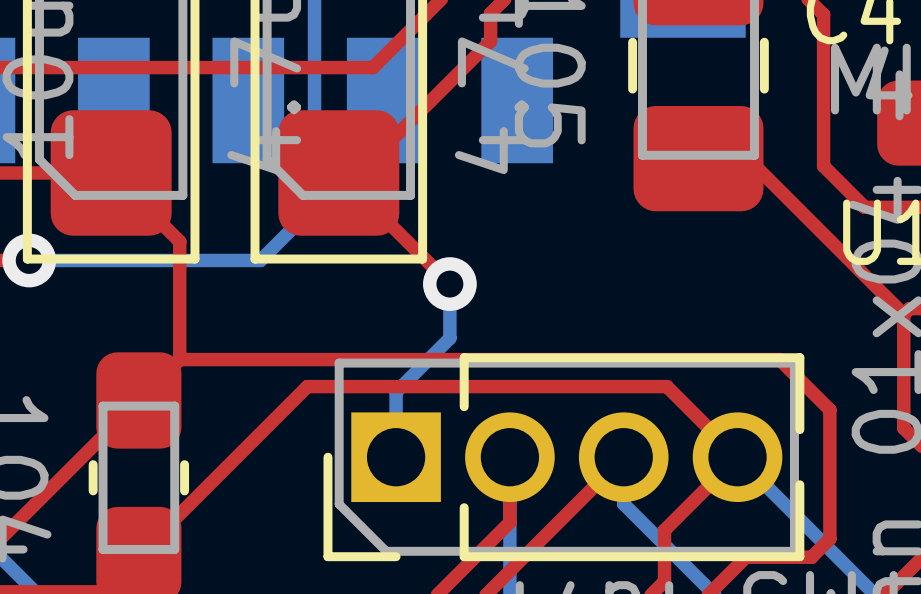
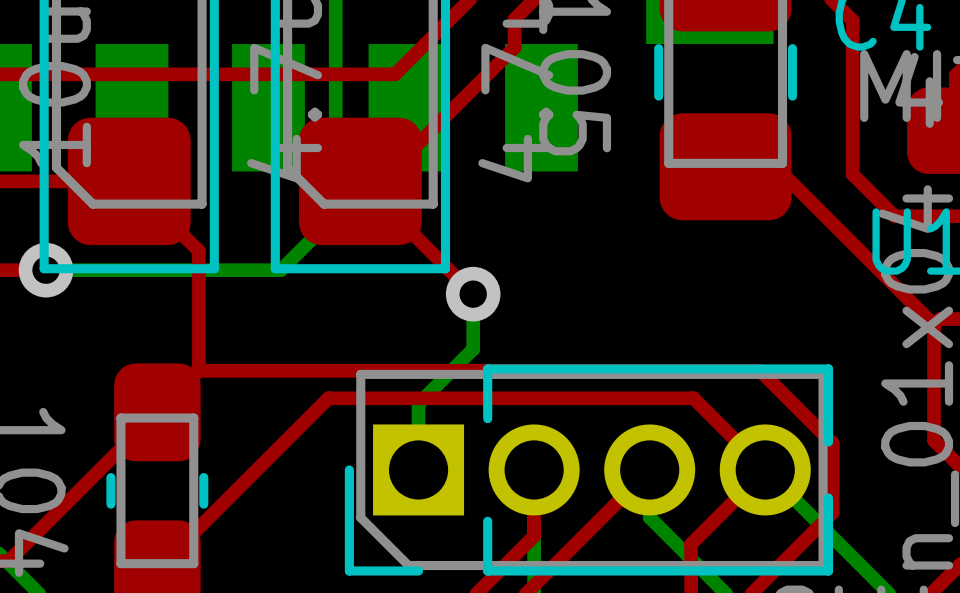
top track: (732, 359) (779, 359) (829, 409) (829, 538) (811, 557) (745, 557) -> (760, 370) (832, 443) (832, 512) (773, 571)

